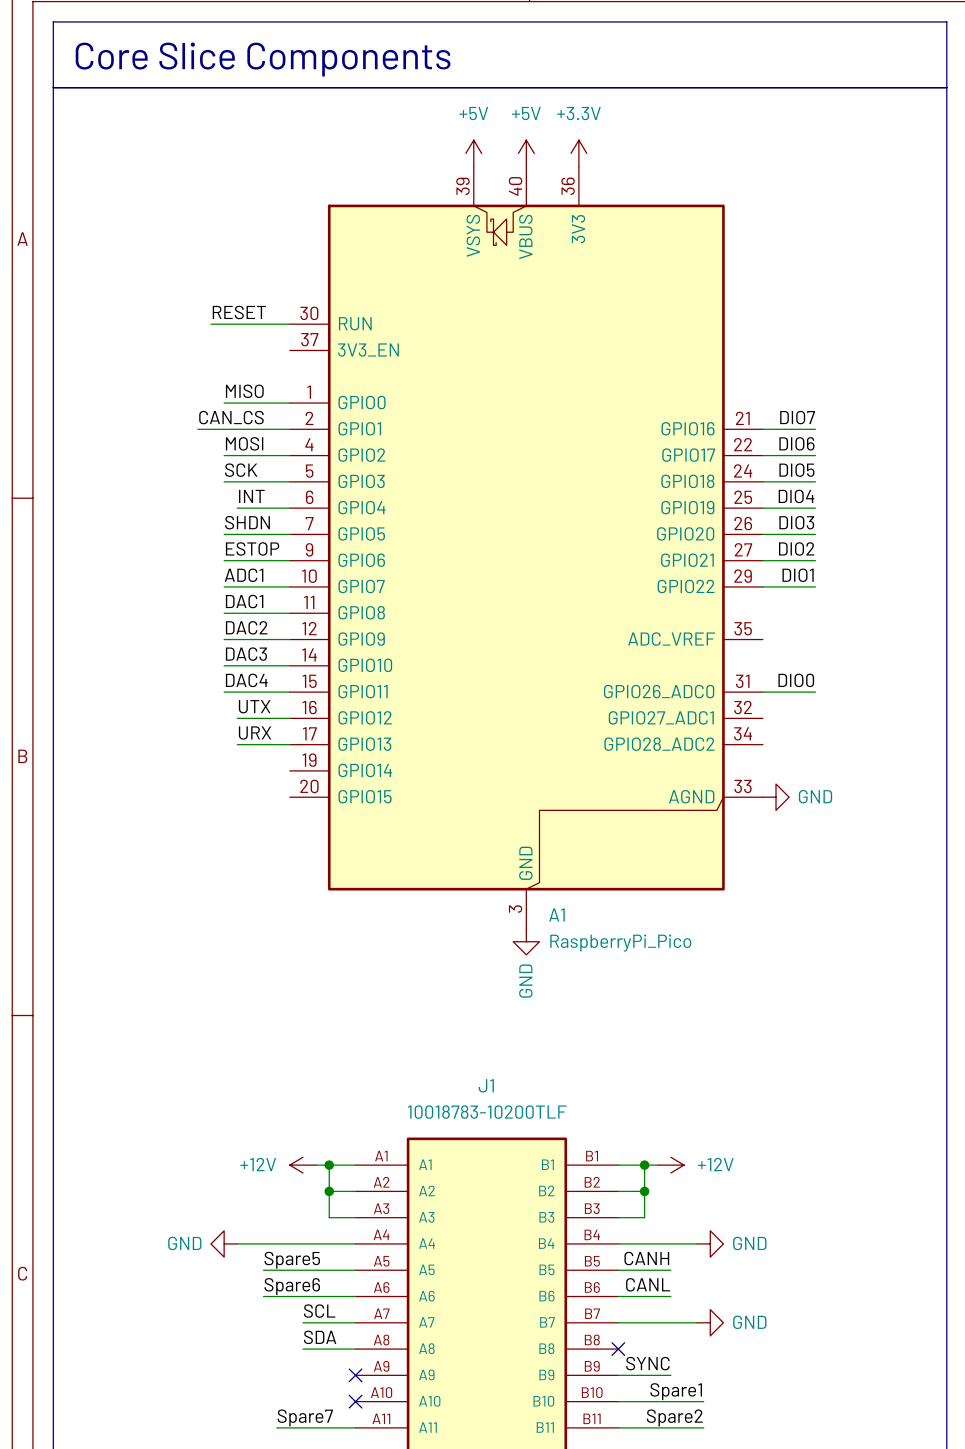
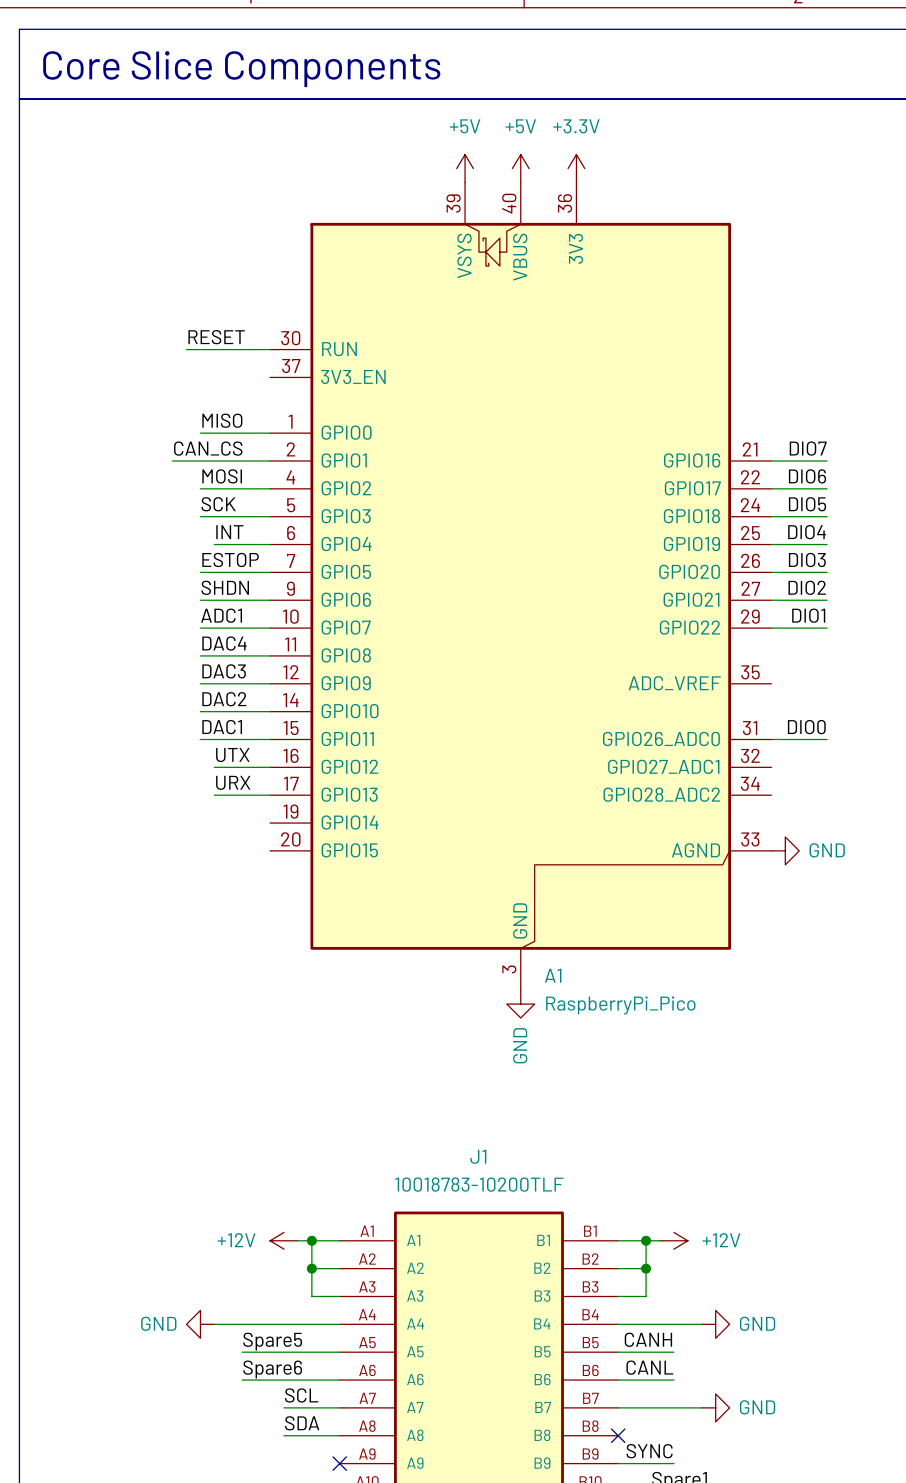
label: SHDN (247, 522) -> ESTOP (230, 559)
label: ESTOP (252, 548) -> SHDN (225, 587)
label: DAC1 (244, 601) -> DAC4 (224, 643)
label: DAC2 (246, 627) -> DAC3 (224, 671)
label: DAC3 (246, 654) -> DAC2 (224, 699)
label: DAC4 (246, 680) -> DAC1 (222, 727)

